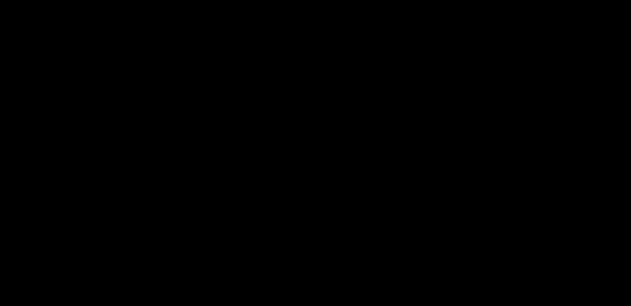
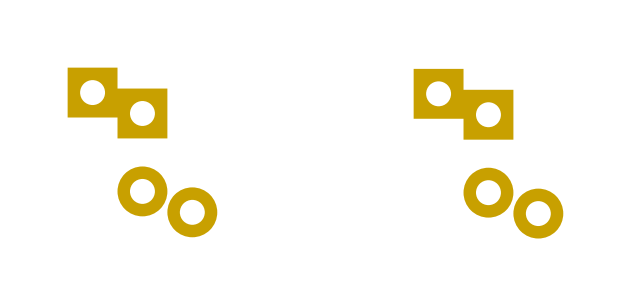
part: none -> (142, 152)
part: none -> (488, 153)

